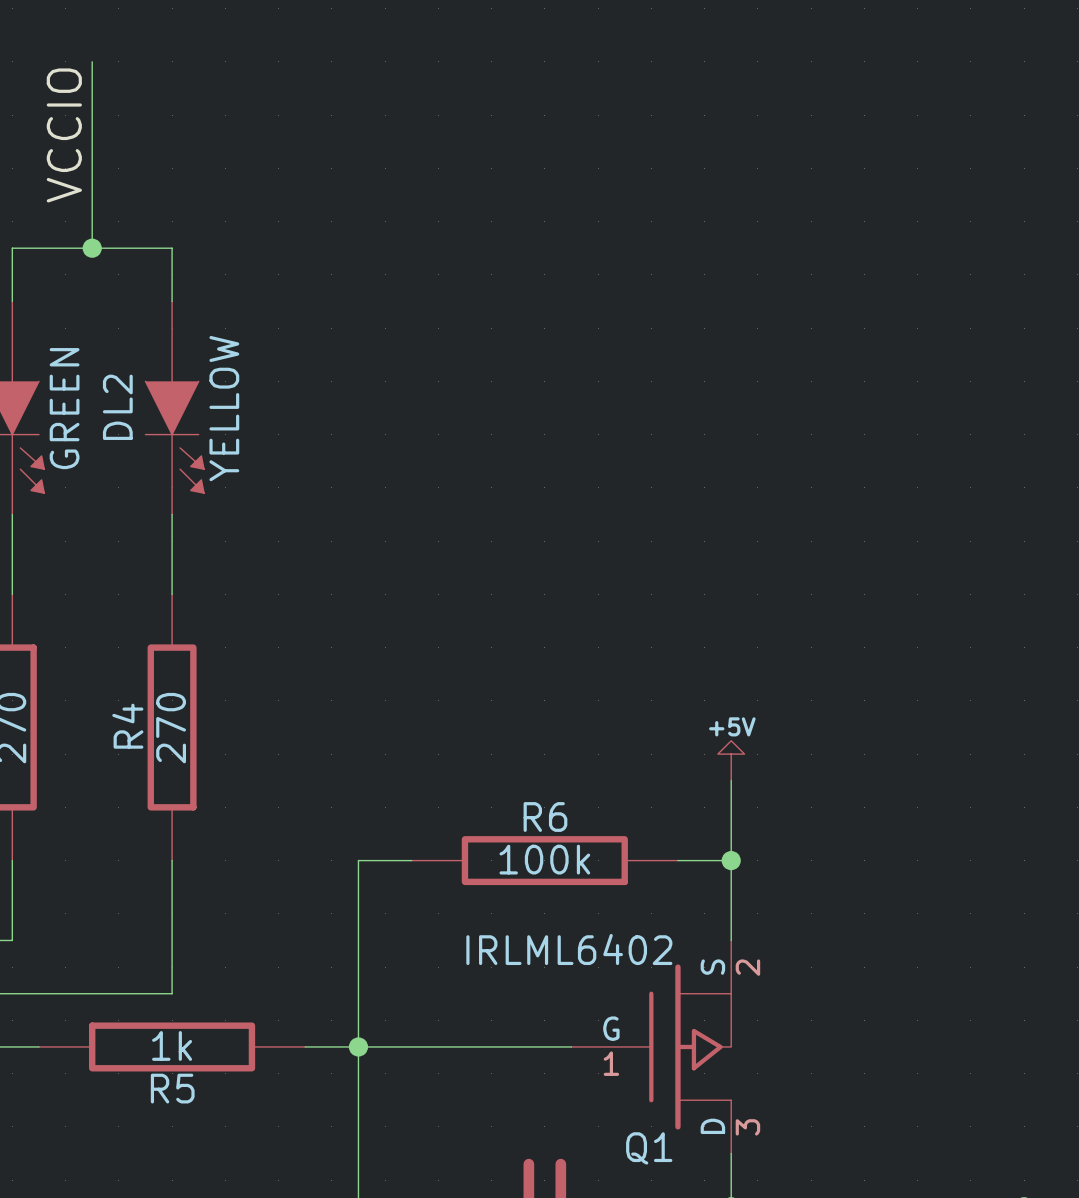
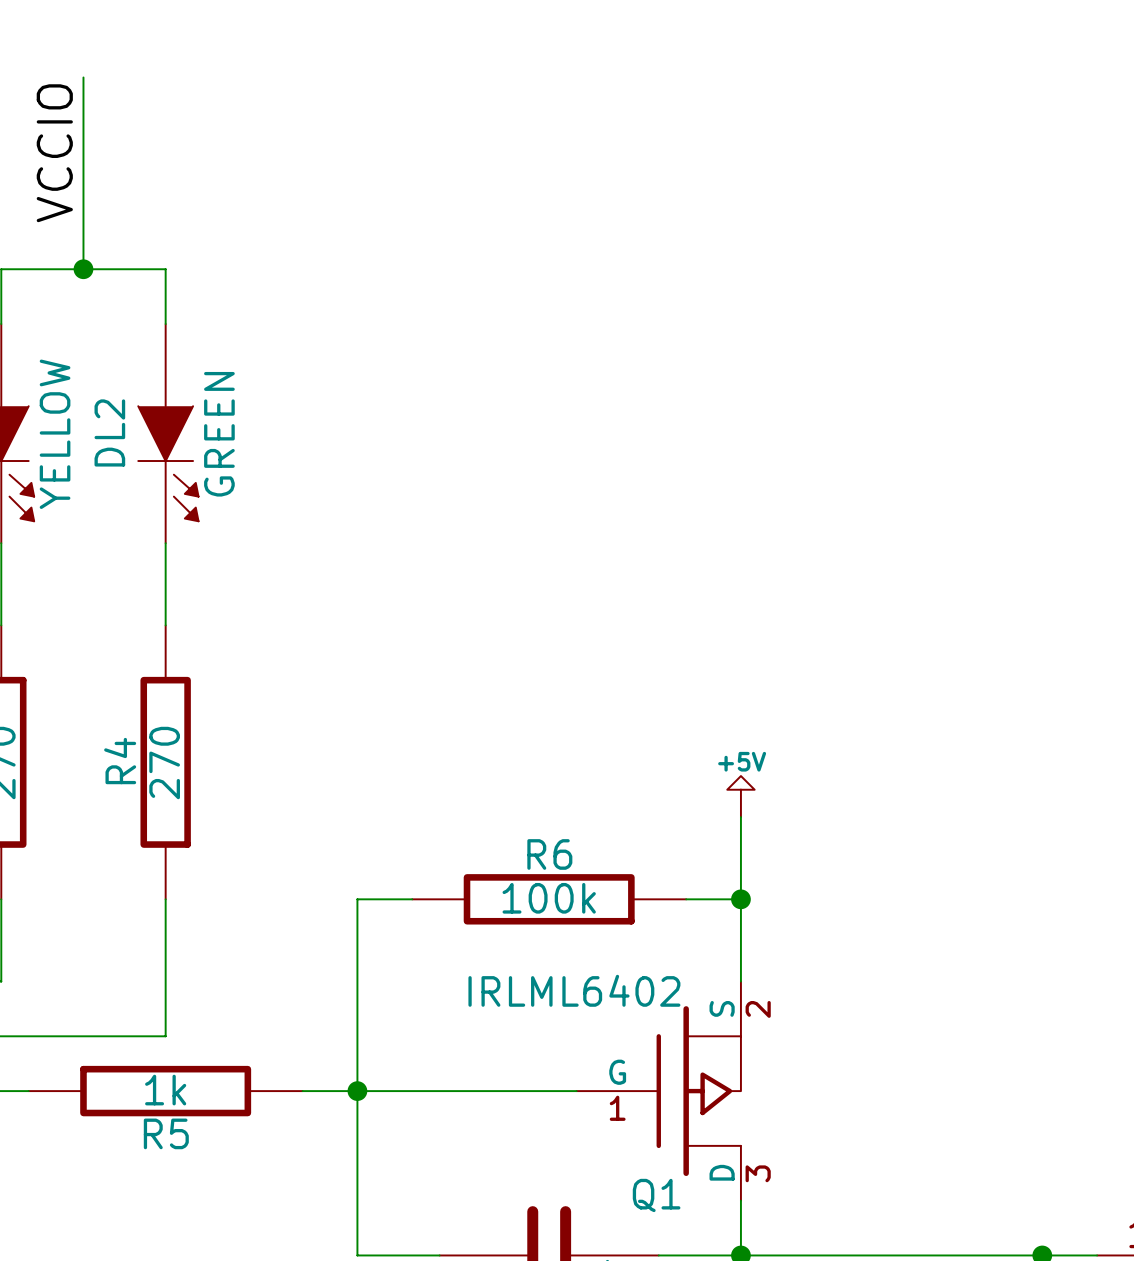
part value: GREEN (64, 408) -> YELLOW (55, 434)
DL2 value: YELLOW (224, 408) -> GREEN (219, 434)

